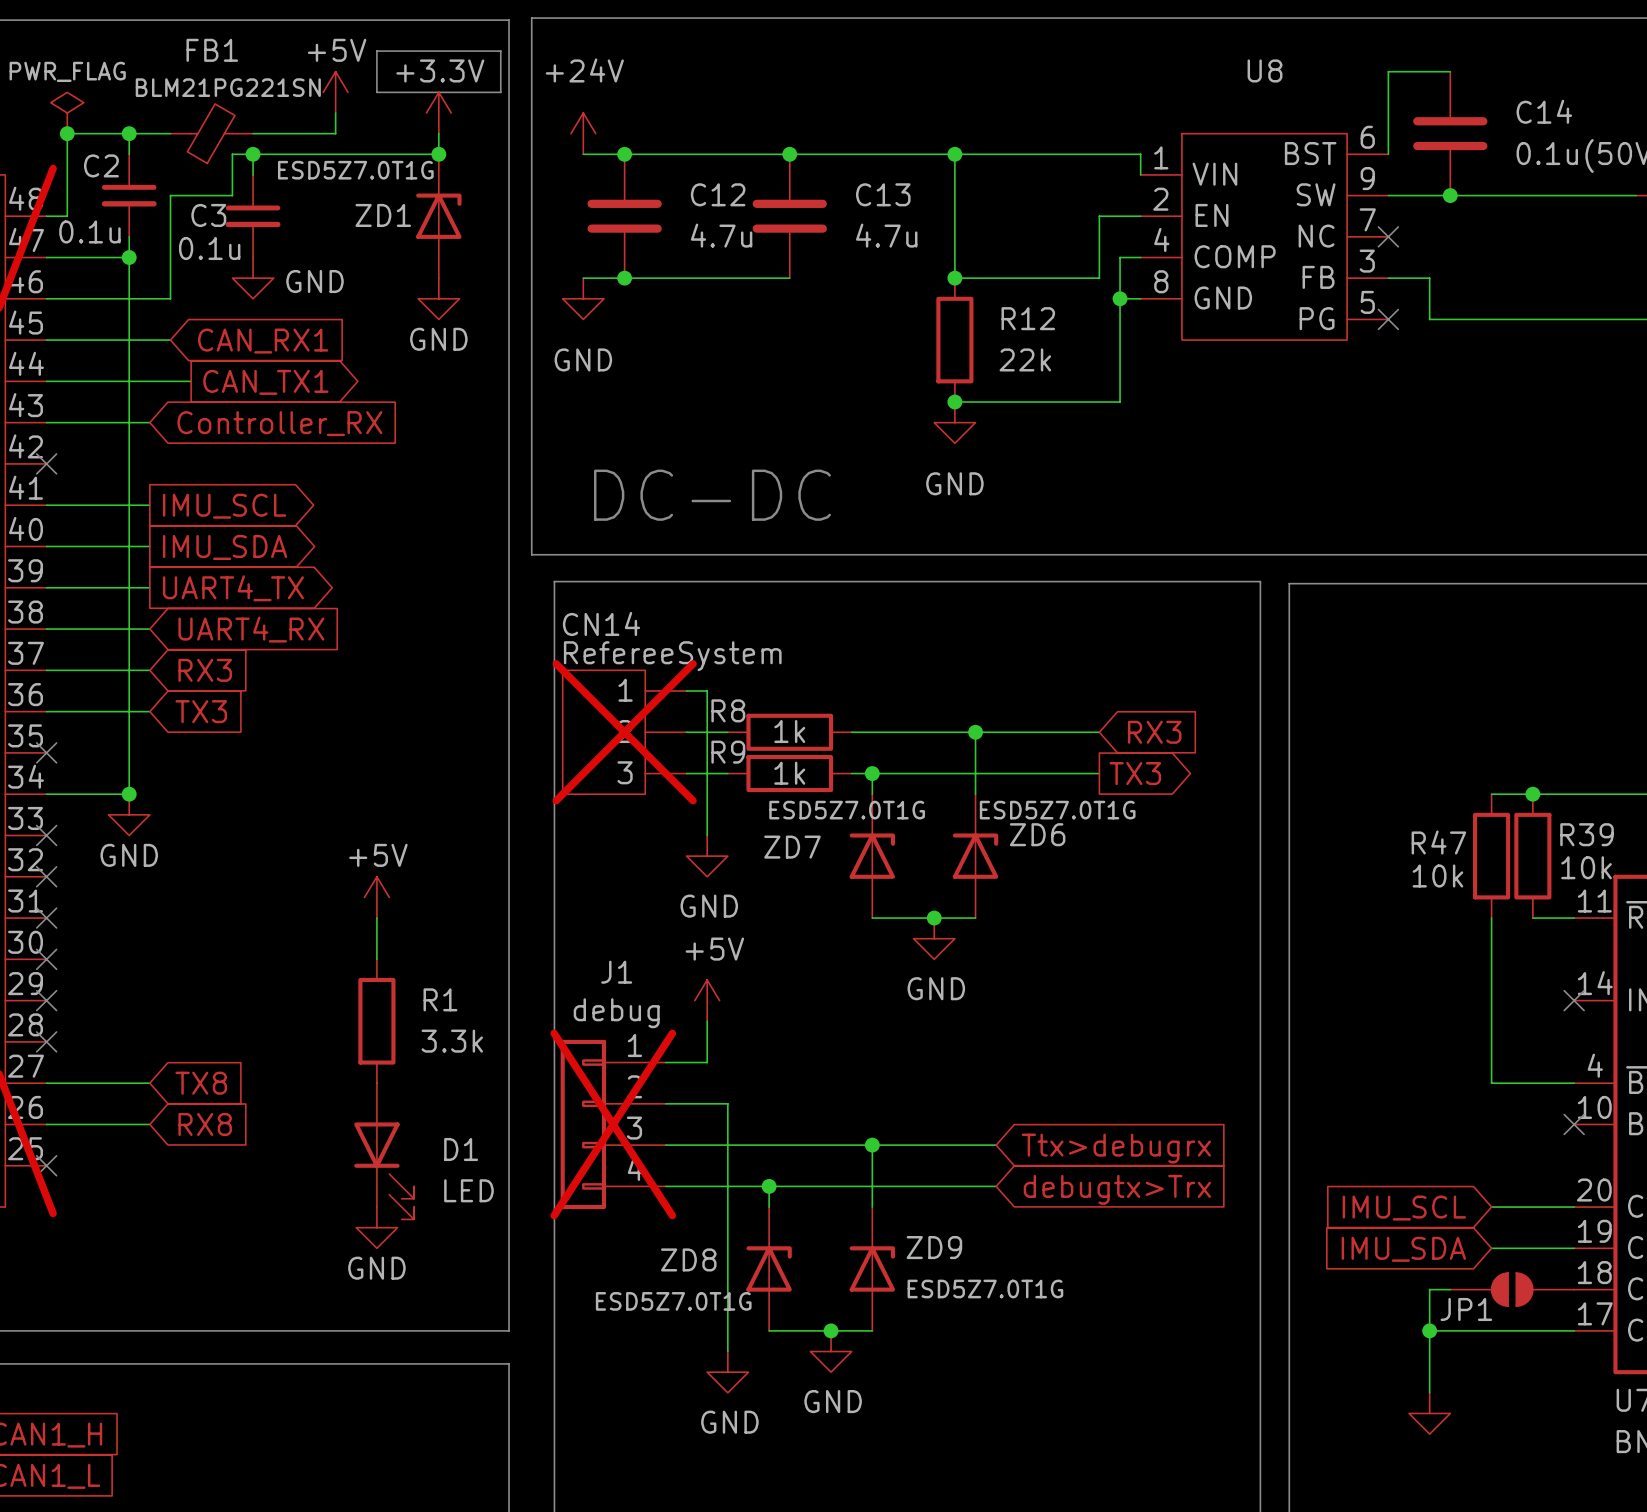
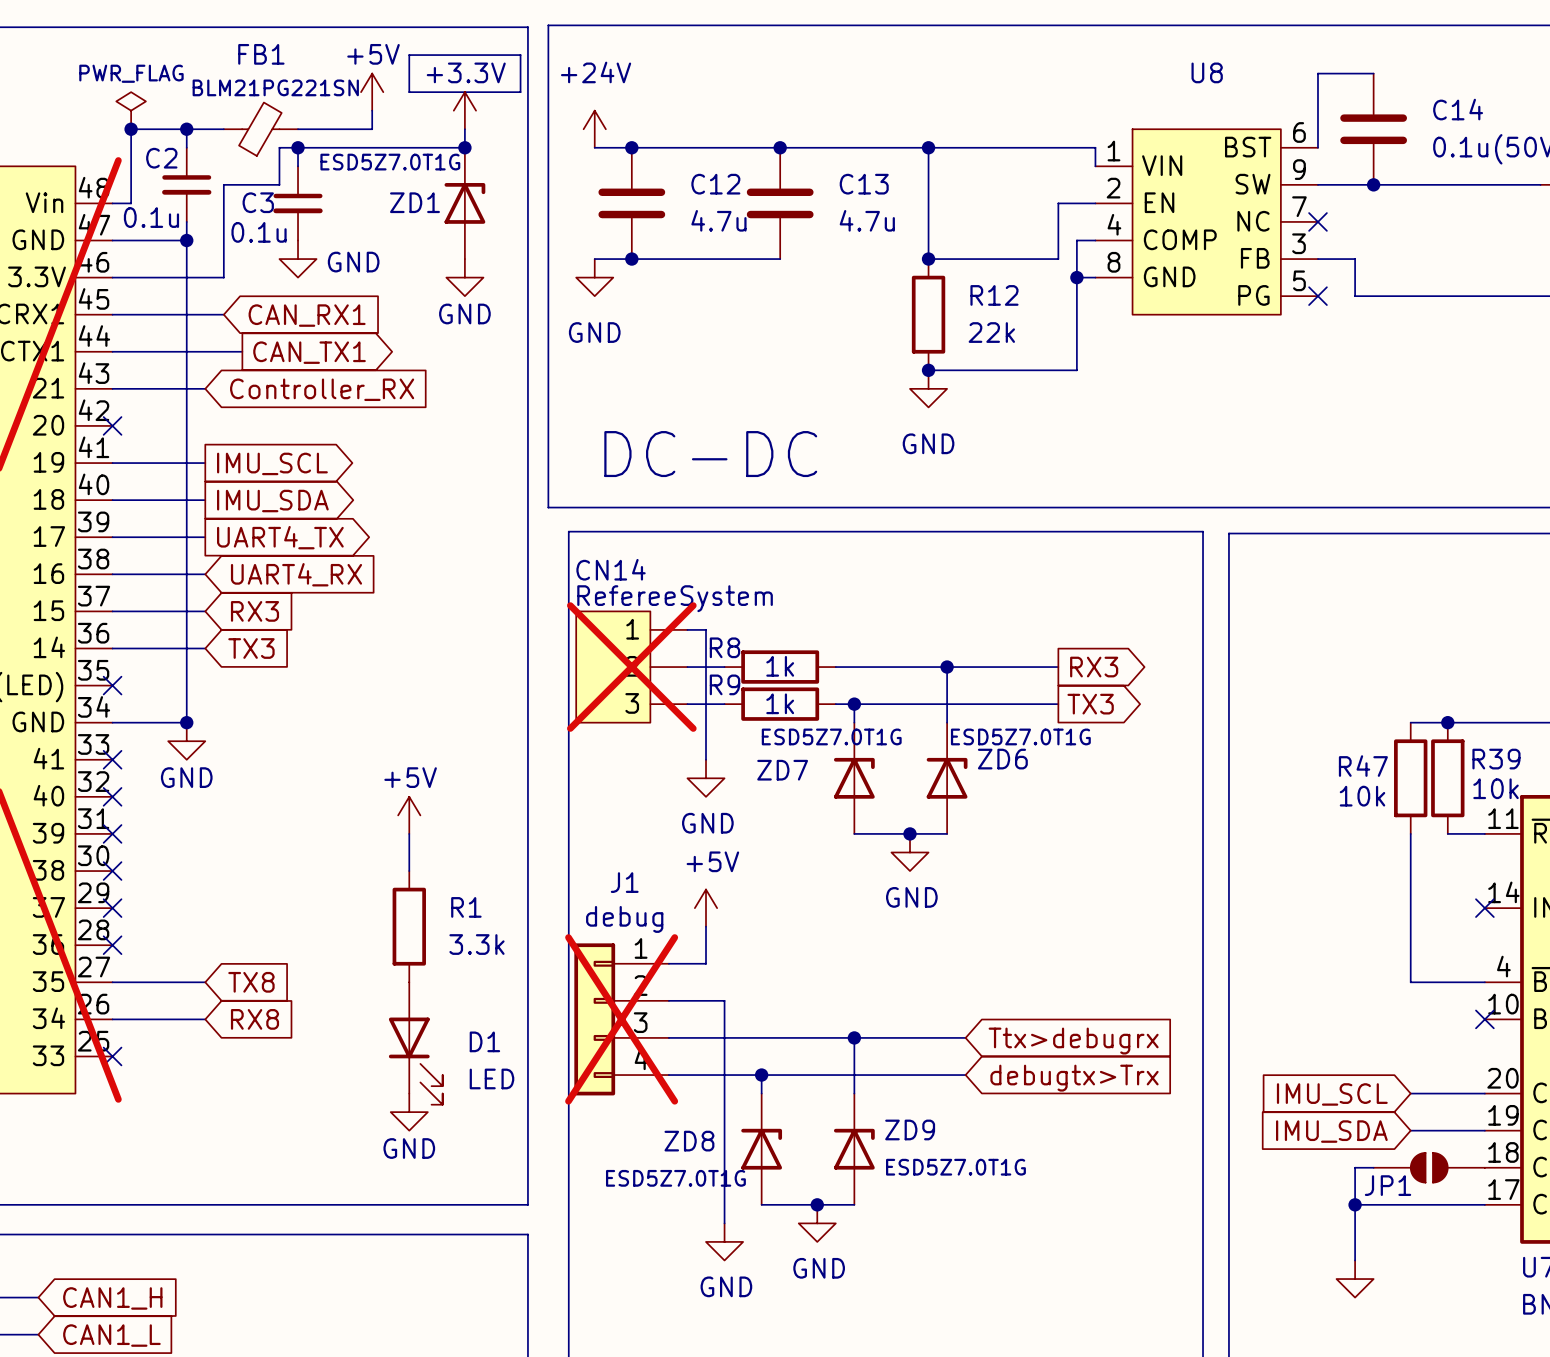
global label shape: input (1154, 732) -> output (1094, 667)

